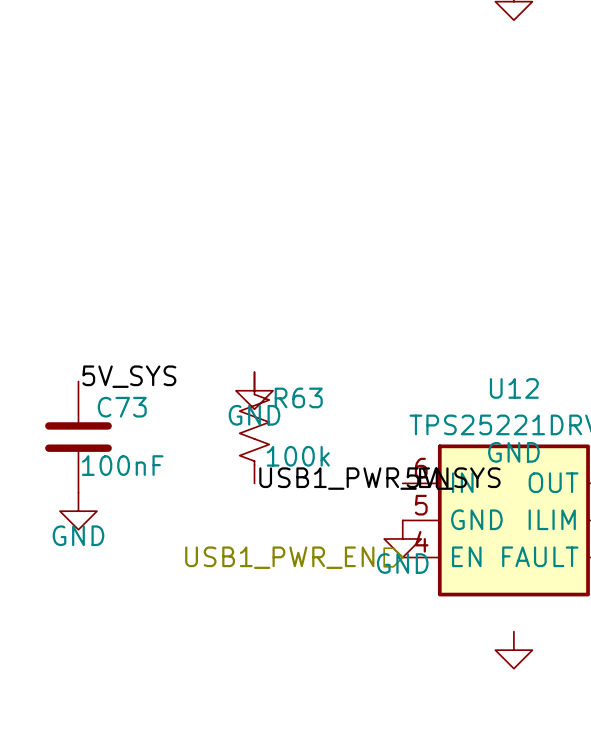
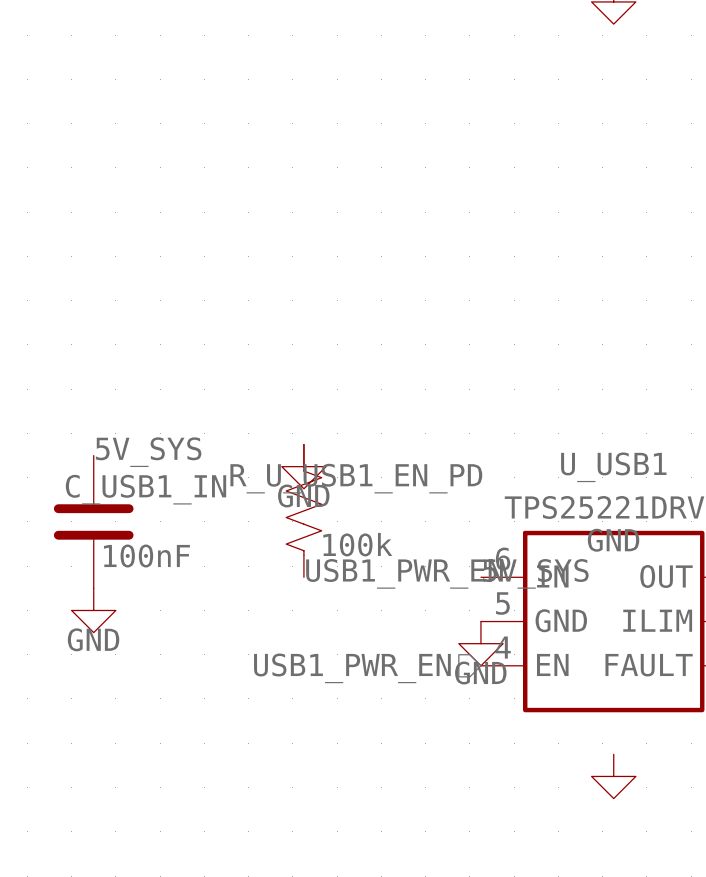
U12 name: U12 (514, 388) -> U_USB1 (613, 467)
R63 name: R63 (298, 397) -> R_U_USB1_EN_PD (356, 478)
C73 name: C73 (122, 407) -> C_USB1_IN (145, 489)

